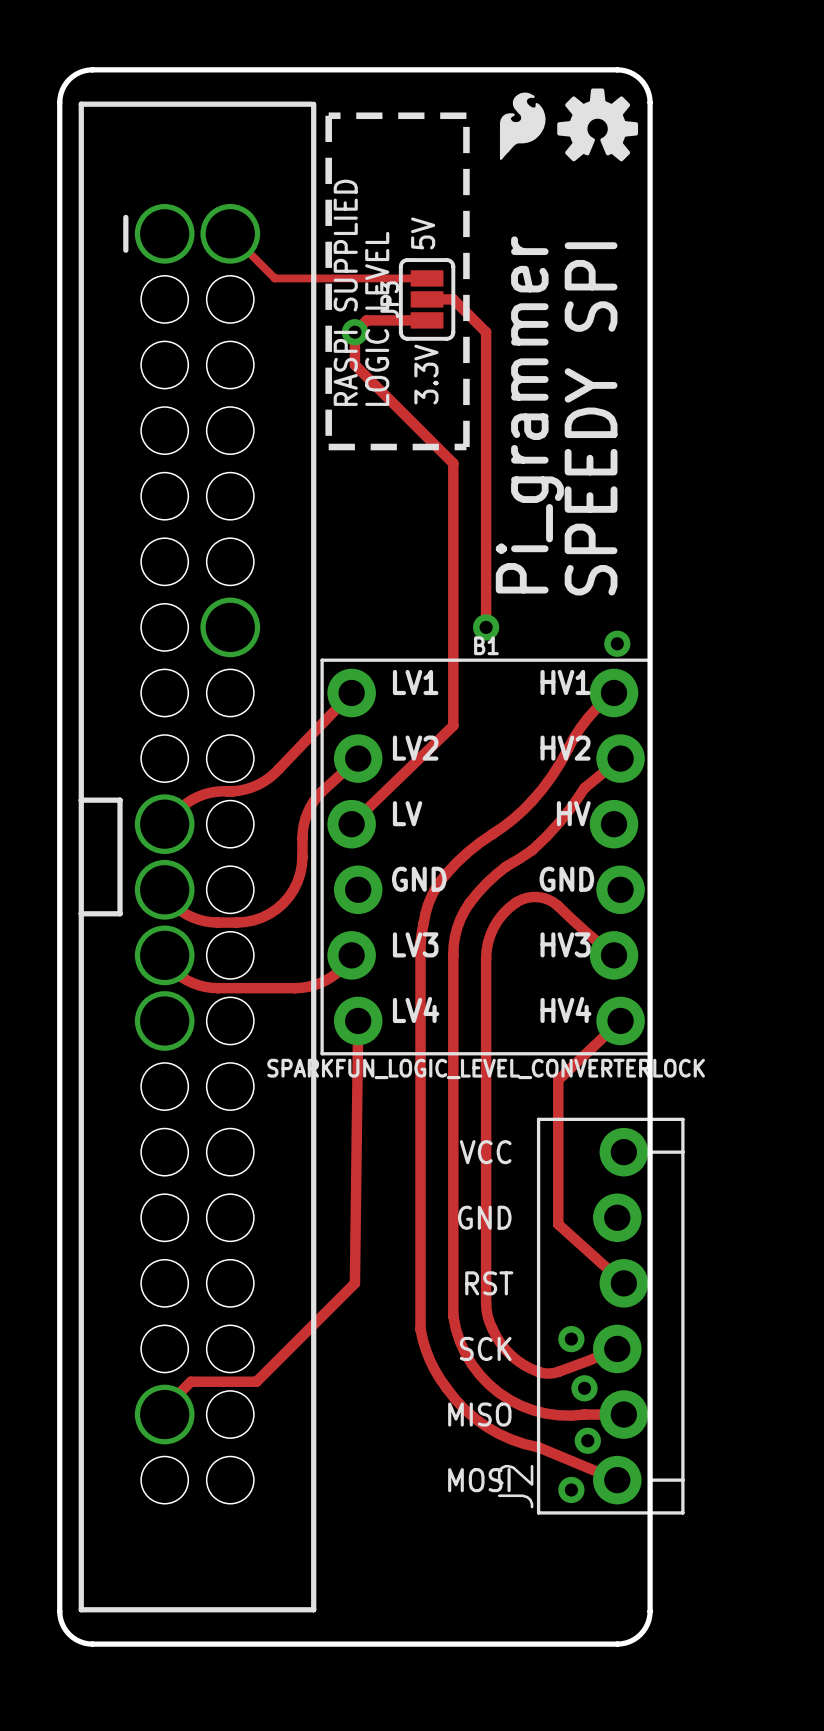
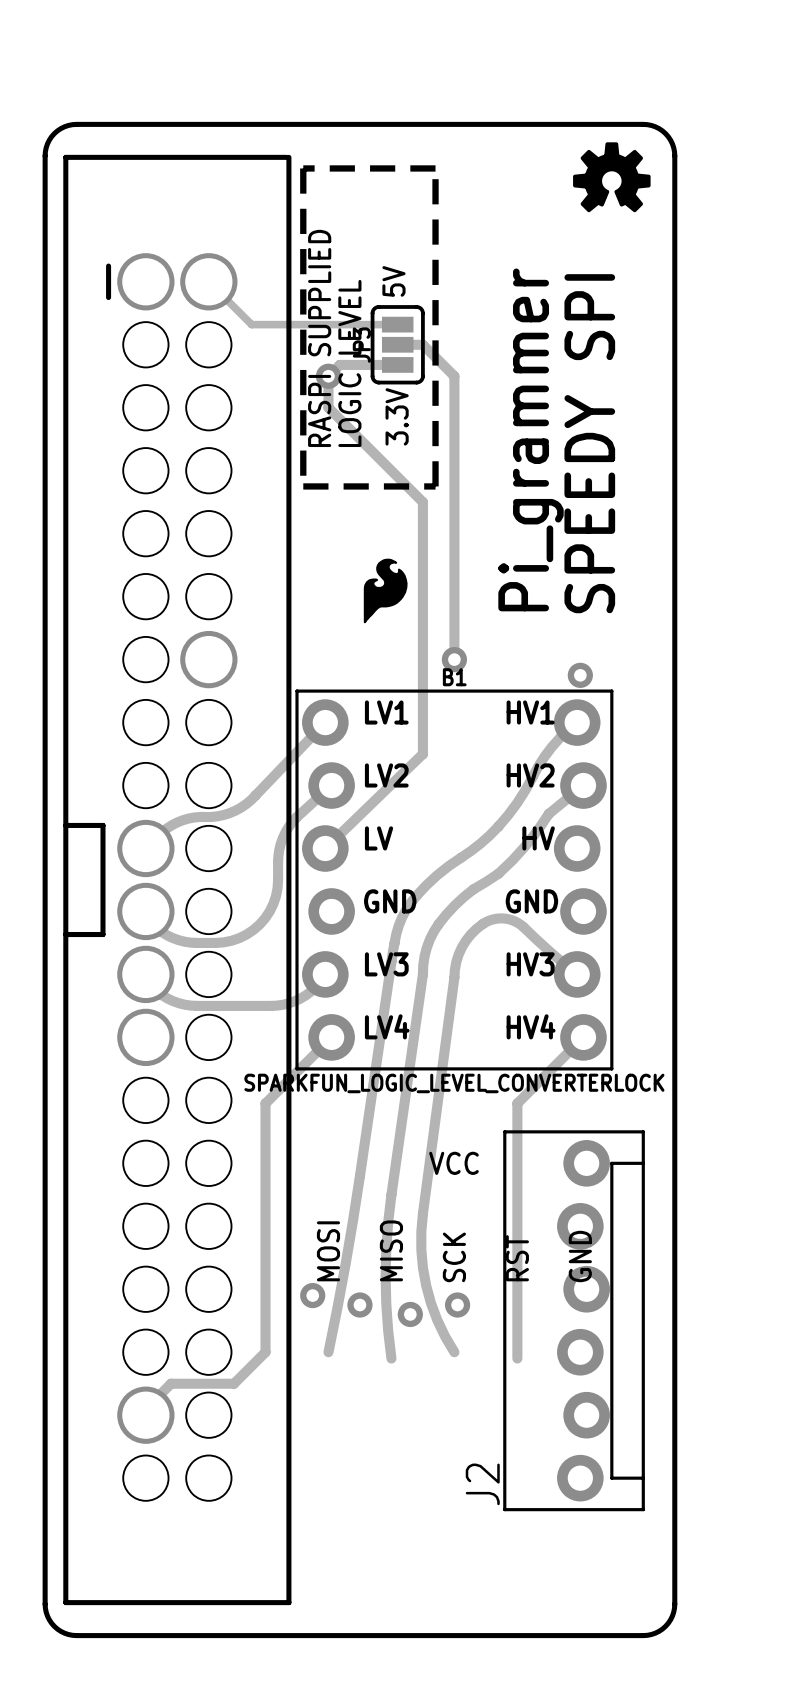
board edge: (617, 69) (629, 72) (640, 79) (647, 90) (650, 102) (650, 1611) (647, 1623) (640, 1634) (629, 1641) (617, 1644) -> (580, 124) (651, 125) (659, 128) (668, 136) (673, 147) (674, 155) (674, 1604) (673, 1612) (668, 1623) (659, 1631) (651, 1634) (580, 1635)
drawing position: (597, 124) -> (611, 177)
drawing position: (522, 126) -> (385, 590)
text position: Pi_grammer (529, 414) -> Pi_grammer (531, 439)
text position: SPEEDY SPI (591, 418) -> SPEEDY SPI (589, 443)
track: (420, 942) (420, 1329) (426, 1350) (434, 1370) (455, 1399) (486, 1426) (511, 1439) (538, 1447) (617, 1480) -> (391, 961) (353, 1220) (328, 1352)
track: (453, 955) (453, 1316) (459, 1341) (479, 1374) (498, 1392) (520, 1405) (558, 1415) (623, 1414) -> (422, 974) (388, 1222) (386, 1304) (391, 1358)
track: (486, 958) (486, 1303) (489, 1323) (500, 1343) (511, 1355) (524, 1365) (541, 1372) (558, 1371) (617, 1348) -> (454, 977) (421, 1231) (421, 1249) (426, 1285) (437, 1320) (454, 1352)
track: (358, 1020) (354, 1283) (289, 1348) -> (331, 1037) (265, 1103) (265, 1352)
track: (620, 1020) (558, 1080) (558, 1224) (623, 1283) -> (583, 1037) (517, 1103) (517, 1358)
text rotation: 0° (484, 1217) -> 90° counterclockwise (580, 1256)
text position: GND (484, 1217) -> GND (580, 1256)
text rotation: 0° (489, 1283) -> 90° counterclockwise (517, 1258)
text position: RST (489, 1283) -> RST (517, 1258)
via: none -> (312, 1295)
via: none -> (359, 1305)
via: none -> (457, 1305)
via: none -> (410, 1314)
via: (571, 1339) -> none
text rotation: 0° (485, 1348) -> 90° counterclockwise (454, 1257)
text position: SCK (485, 1348) -> SCK (454, 1257)
via: (584, 1388) -> none
text rotation: 0° (479, 1414) -> 90° counterclockwise (391, 1250)
text position: MISO (479, 1414) -> MISO (391, 1250)
via: (587, 1440) -> none
text rotation: 0° (479, 1480) -> 90° counterclockwise (328, 1251)
text position: MOSI (479, 1480) -> MOSI (328, 1251)
via: (571, 1489) -> none

